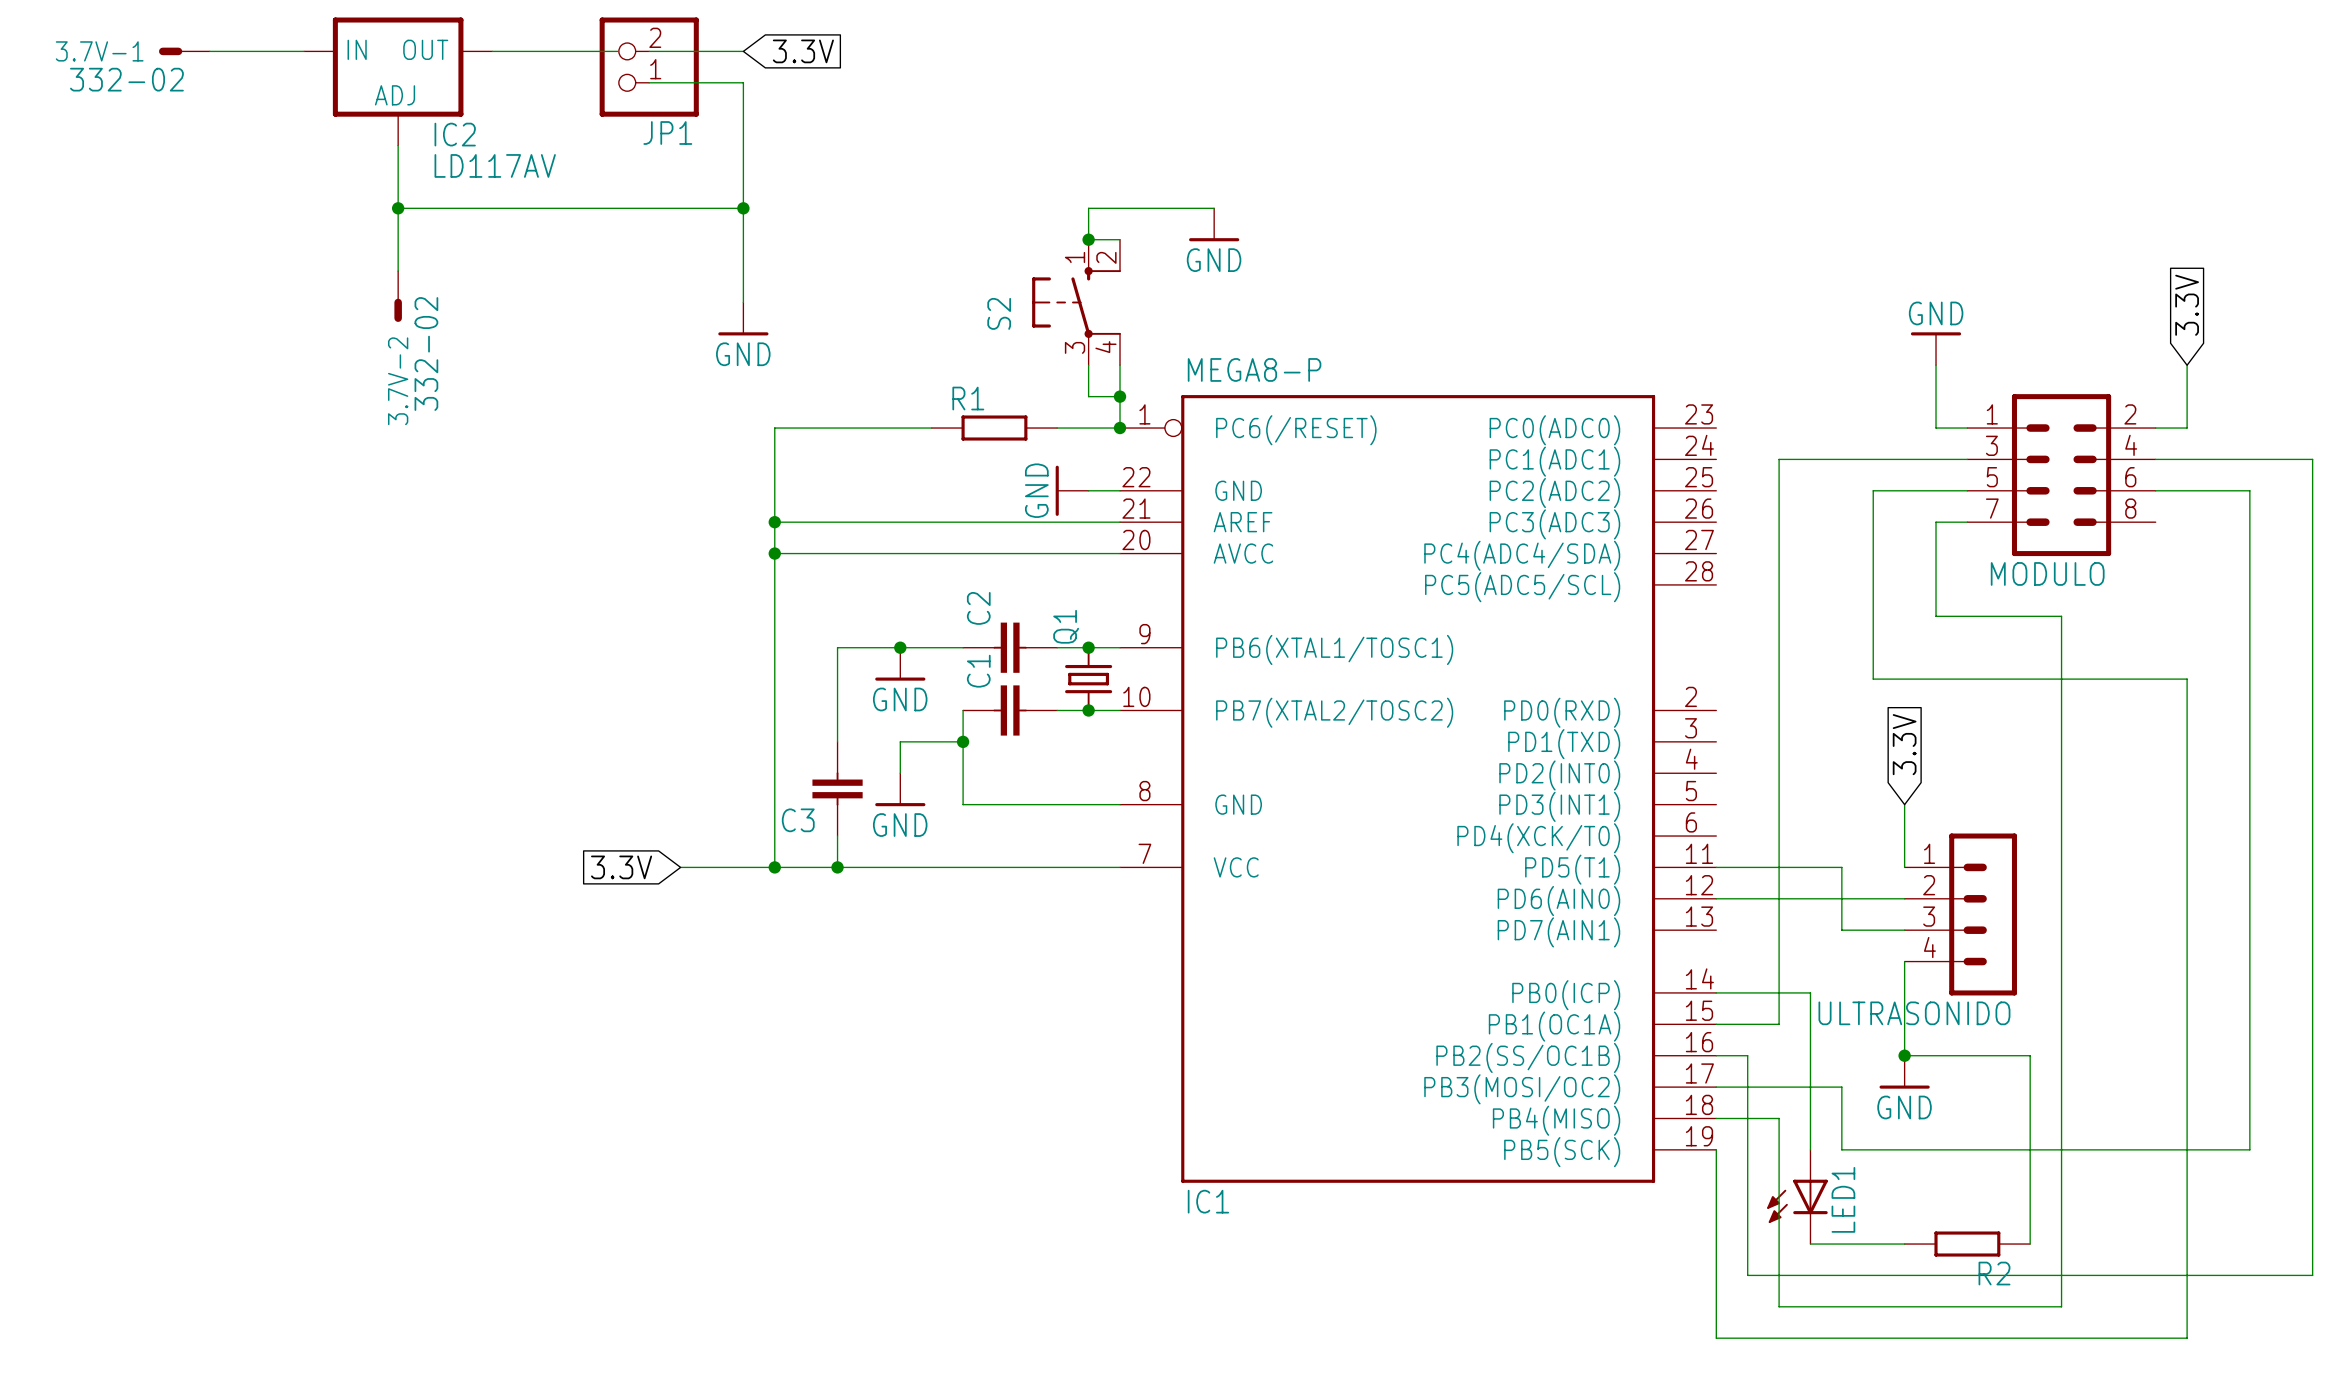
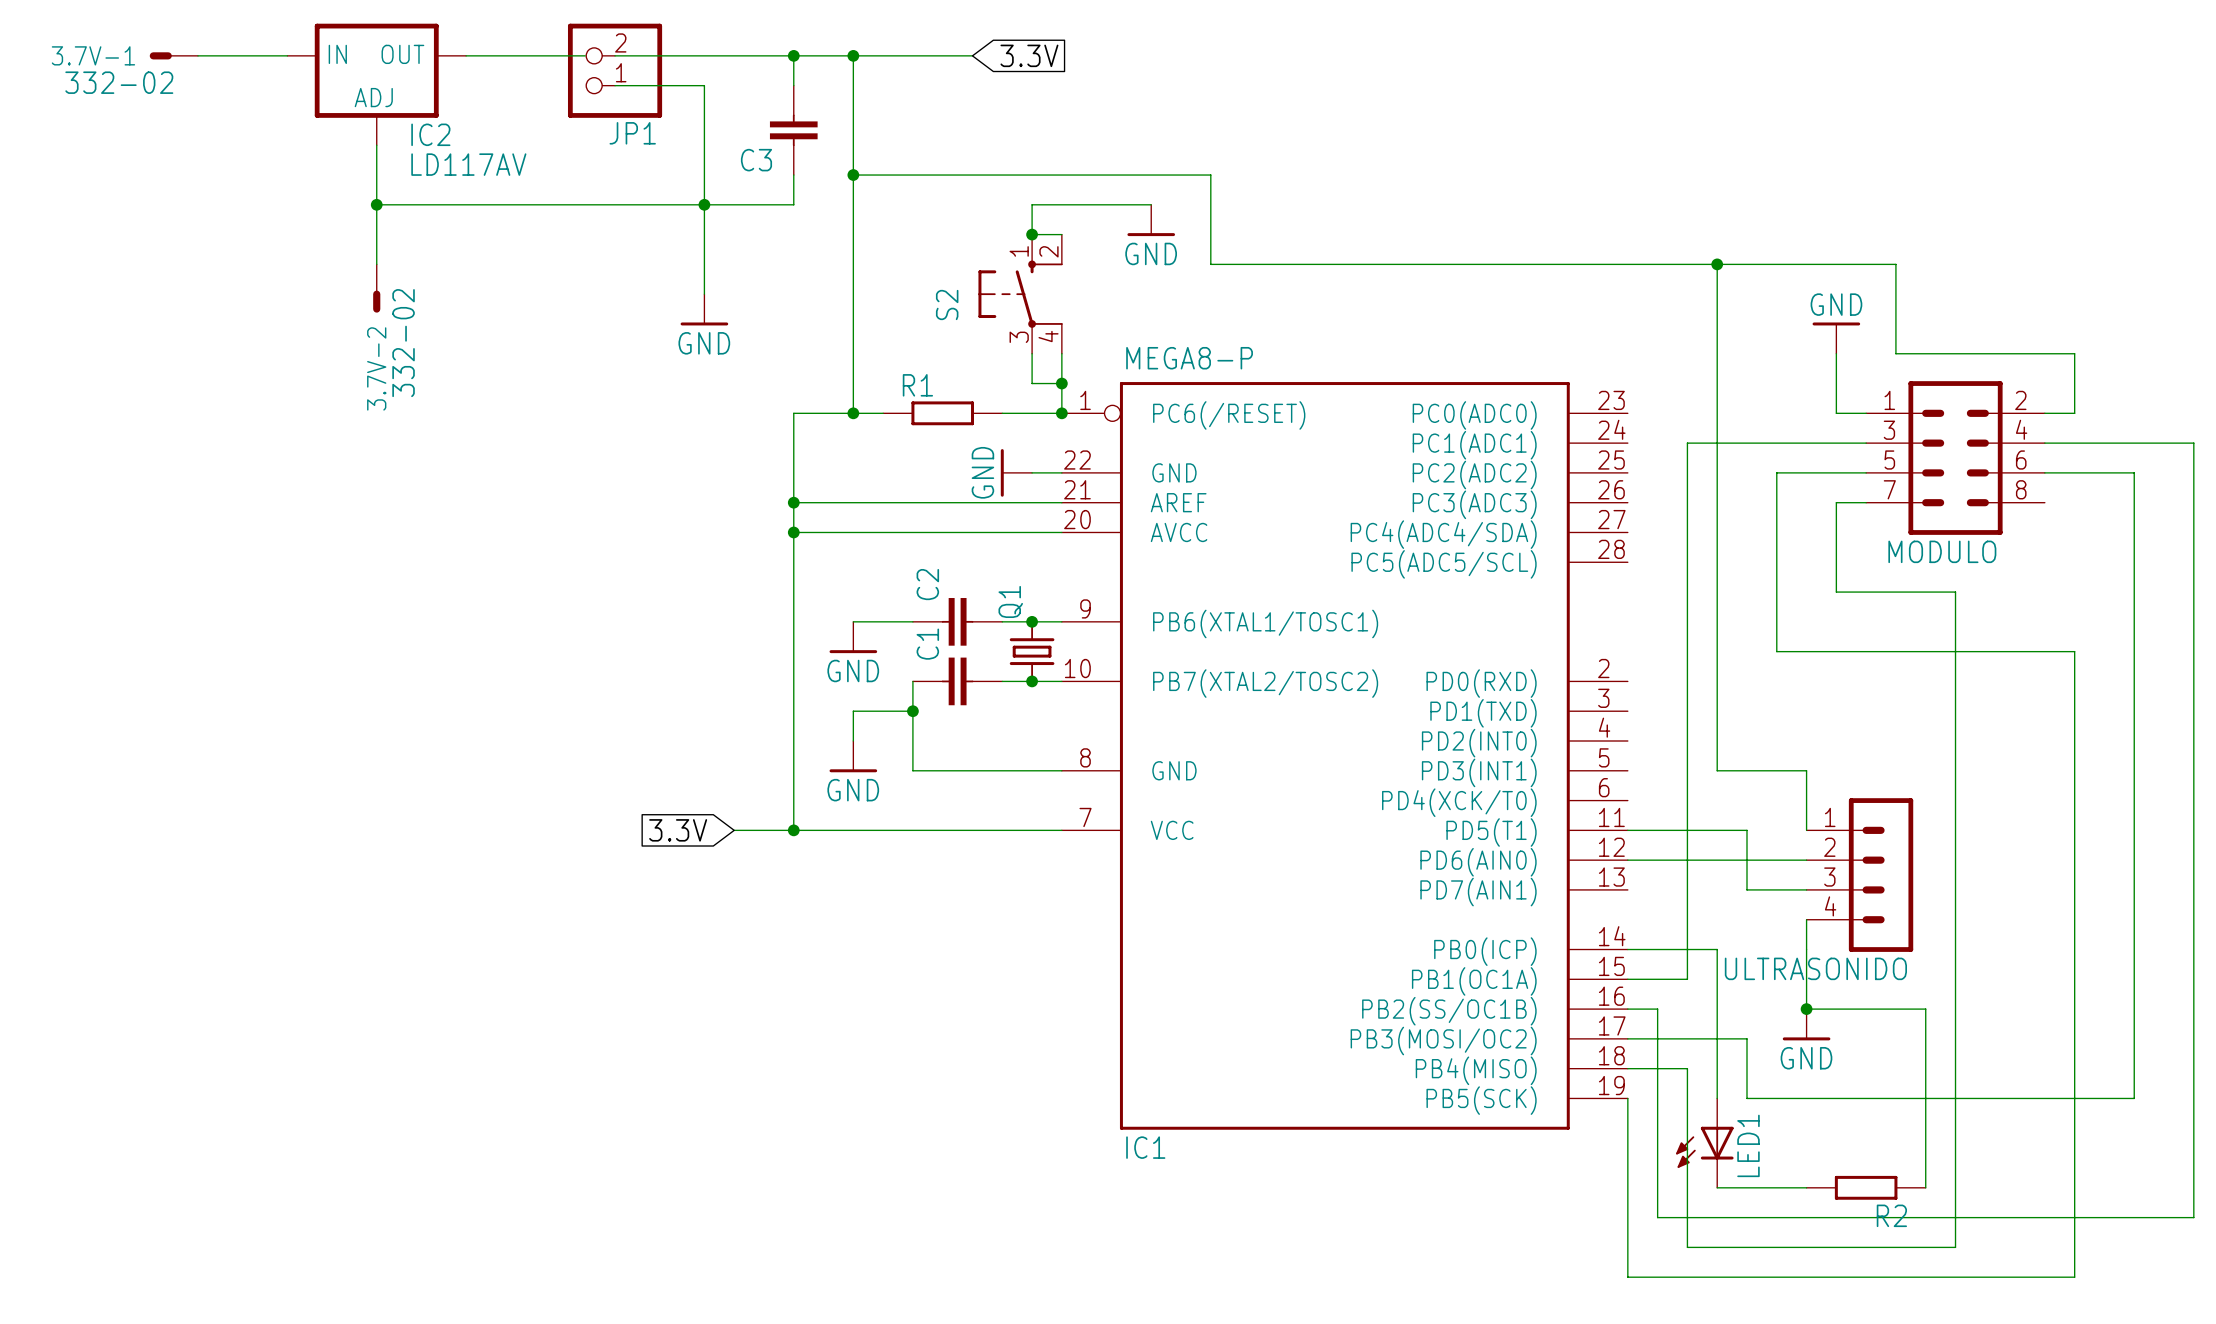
wire: none -> (704, 55) (972, 55)
global label position: 3.3V (803, 51) -> 3.3V (1029, 55)
wire: none -> (793, 55) (793, 85)
junction: none -> (793, 55)
wire: none -> (853, 55) (853, 413)
junction: none -> (853, 55)
wire: none -> (793, 175) (793, 204) (704, 204)
wire: none -> (853, 175) (1210, 175) (1210, 264) (1895, 264) (1895, 353) (2074, 353)
junction: none -> (853, 175)
wire: none -> (1717, 264) (1717, 770) (1806, 770)
junction: none -> (1717, 264)
global label: 3.3V (2187, 305) -> none
wire: (837, 428) (774, 428) (774, 867) (680, 867) -> none
junction: none -> (853, 413)
wire: (774, 522) (837, 522) -> none
junction: (774, 522) -> none
junction: none -> (793, 502)
wire: (774, 553) (837, 553) -> none
junction: (774, 553) -> none
junction: none -> (793, 532)
wire: (837, 647) (900, 647) -> (793, 621) (793, 413)
junction: (900, 647) -> none
global label: 3.3V (1904, 744) -> none
C3 position: (837, 788) -> (793, 130)
global label position: 3.3V (621, 867) -> 3.3V (678, 830)
junction: (774, 867) -> none

